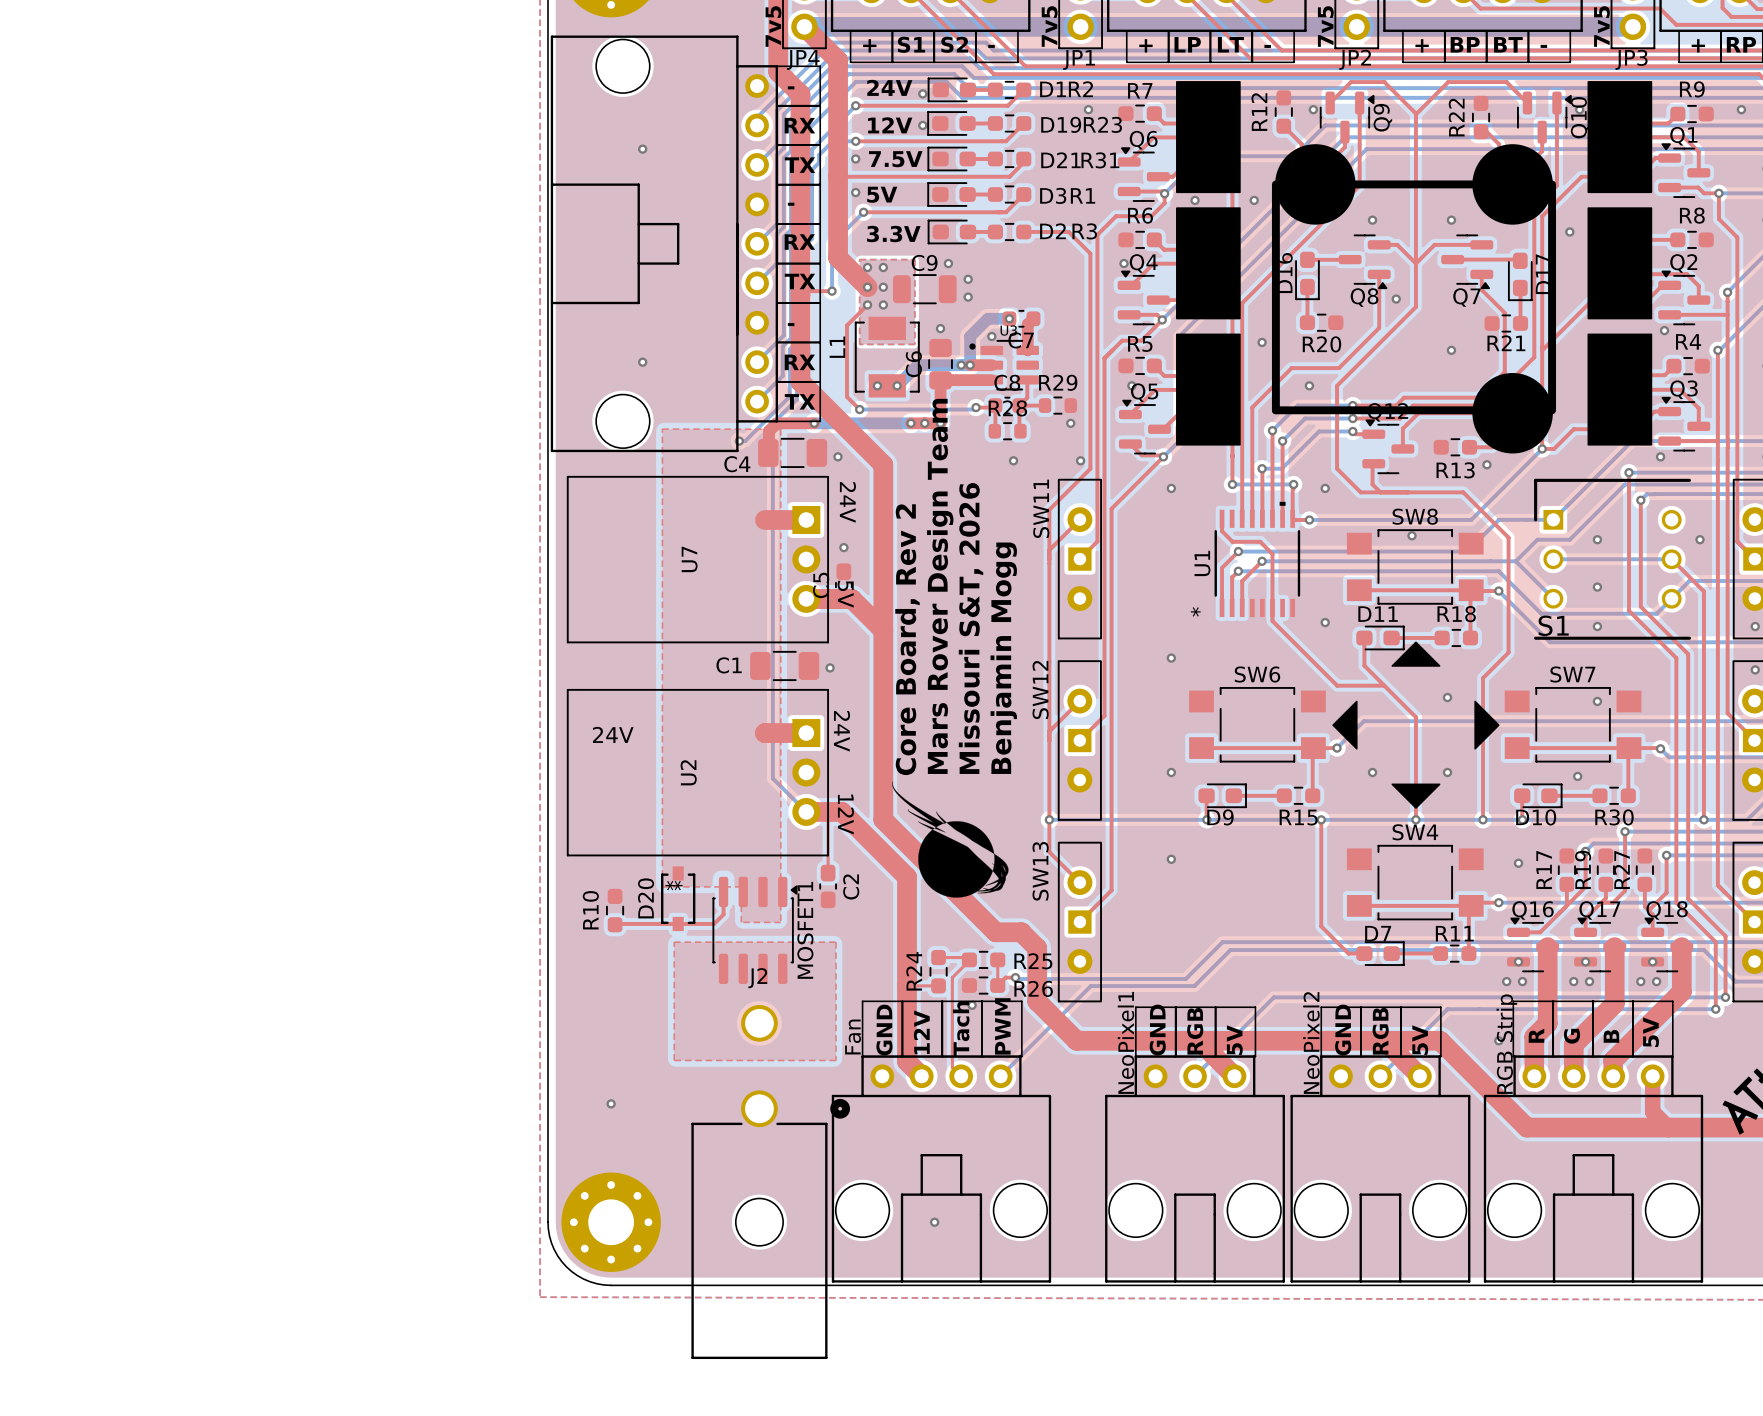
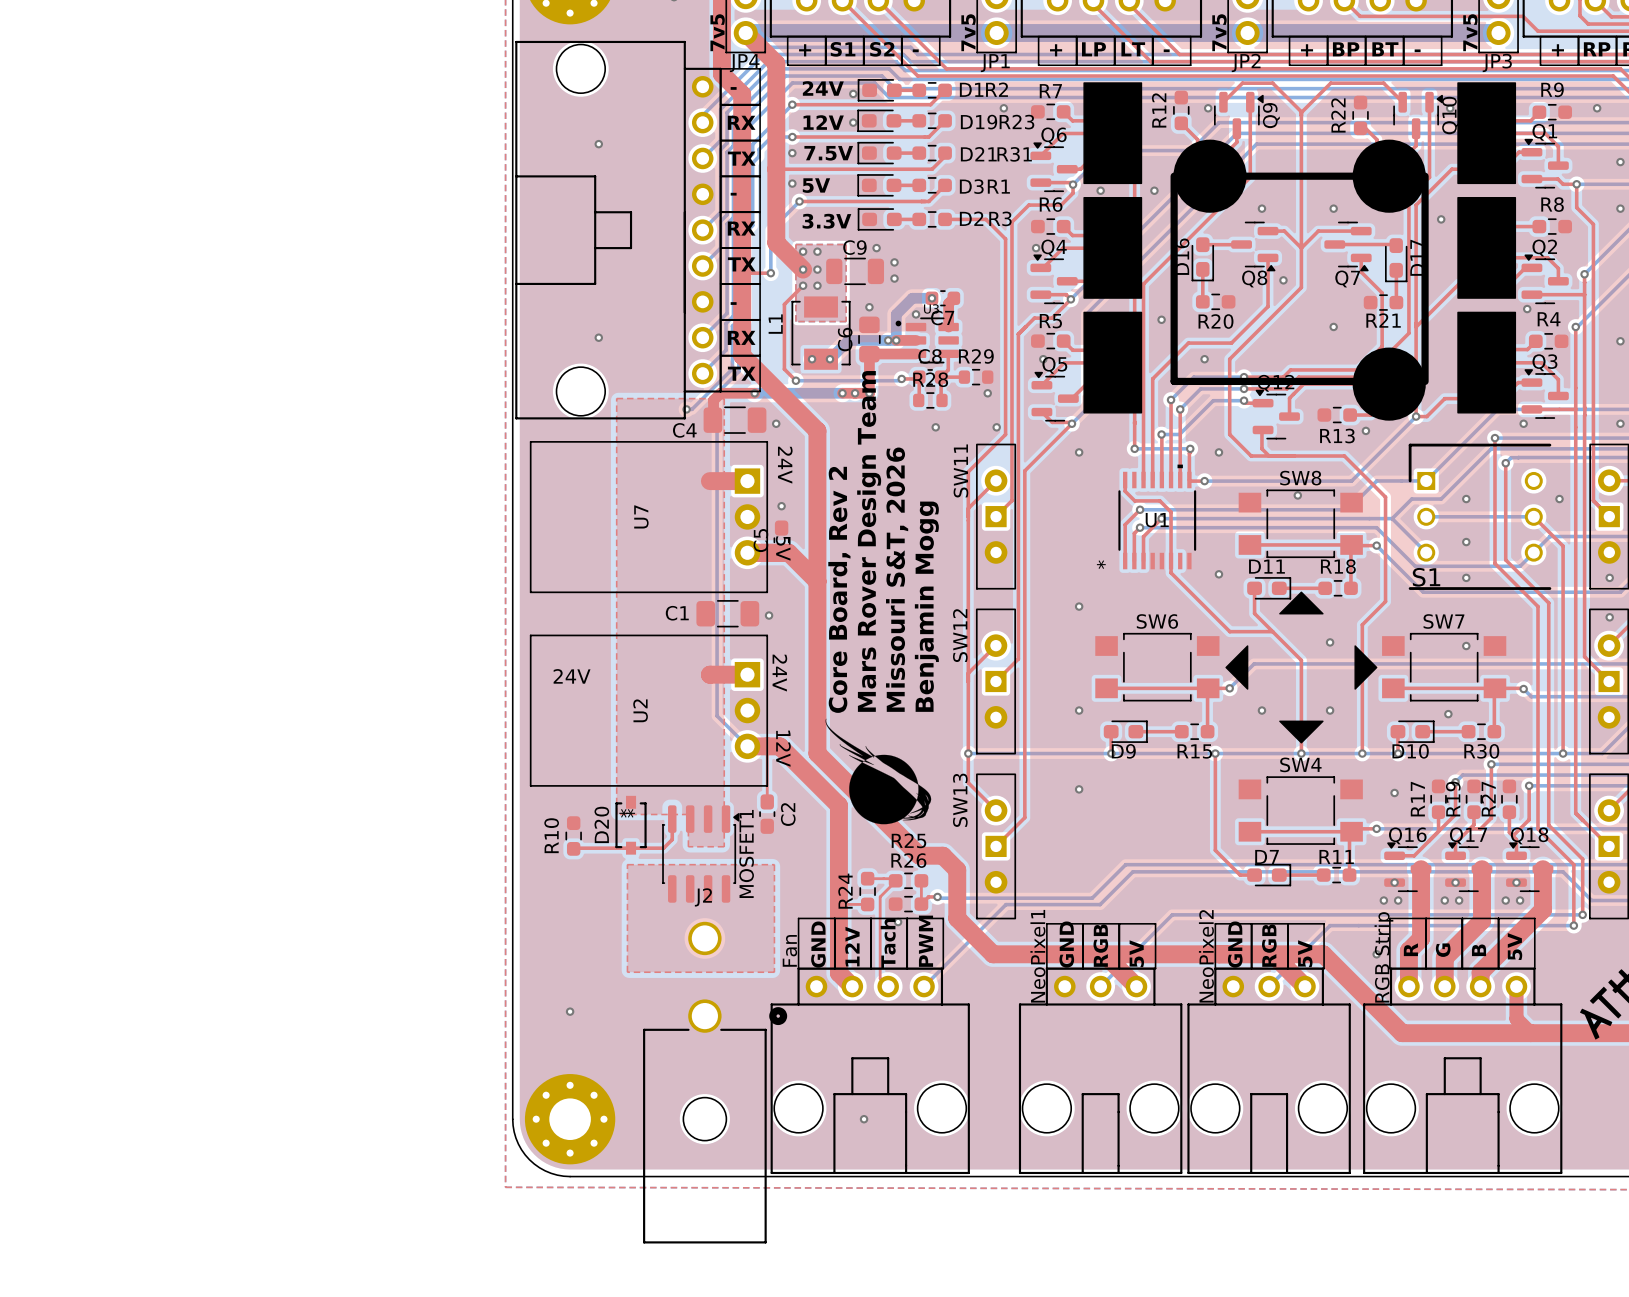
U1 name rotation: 0° (1202, 563) -> 90° clockwise (1157, 520)
U1 name position: U1 (1202, 563) -> U1 (1157, 520)
R25 name position: R25 (1033, 961) -> R25 (908, 840)
R26 name position: R26 (1033, 988) -> R26 (908, 860)

